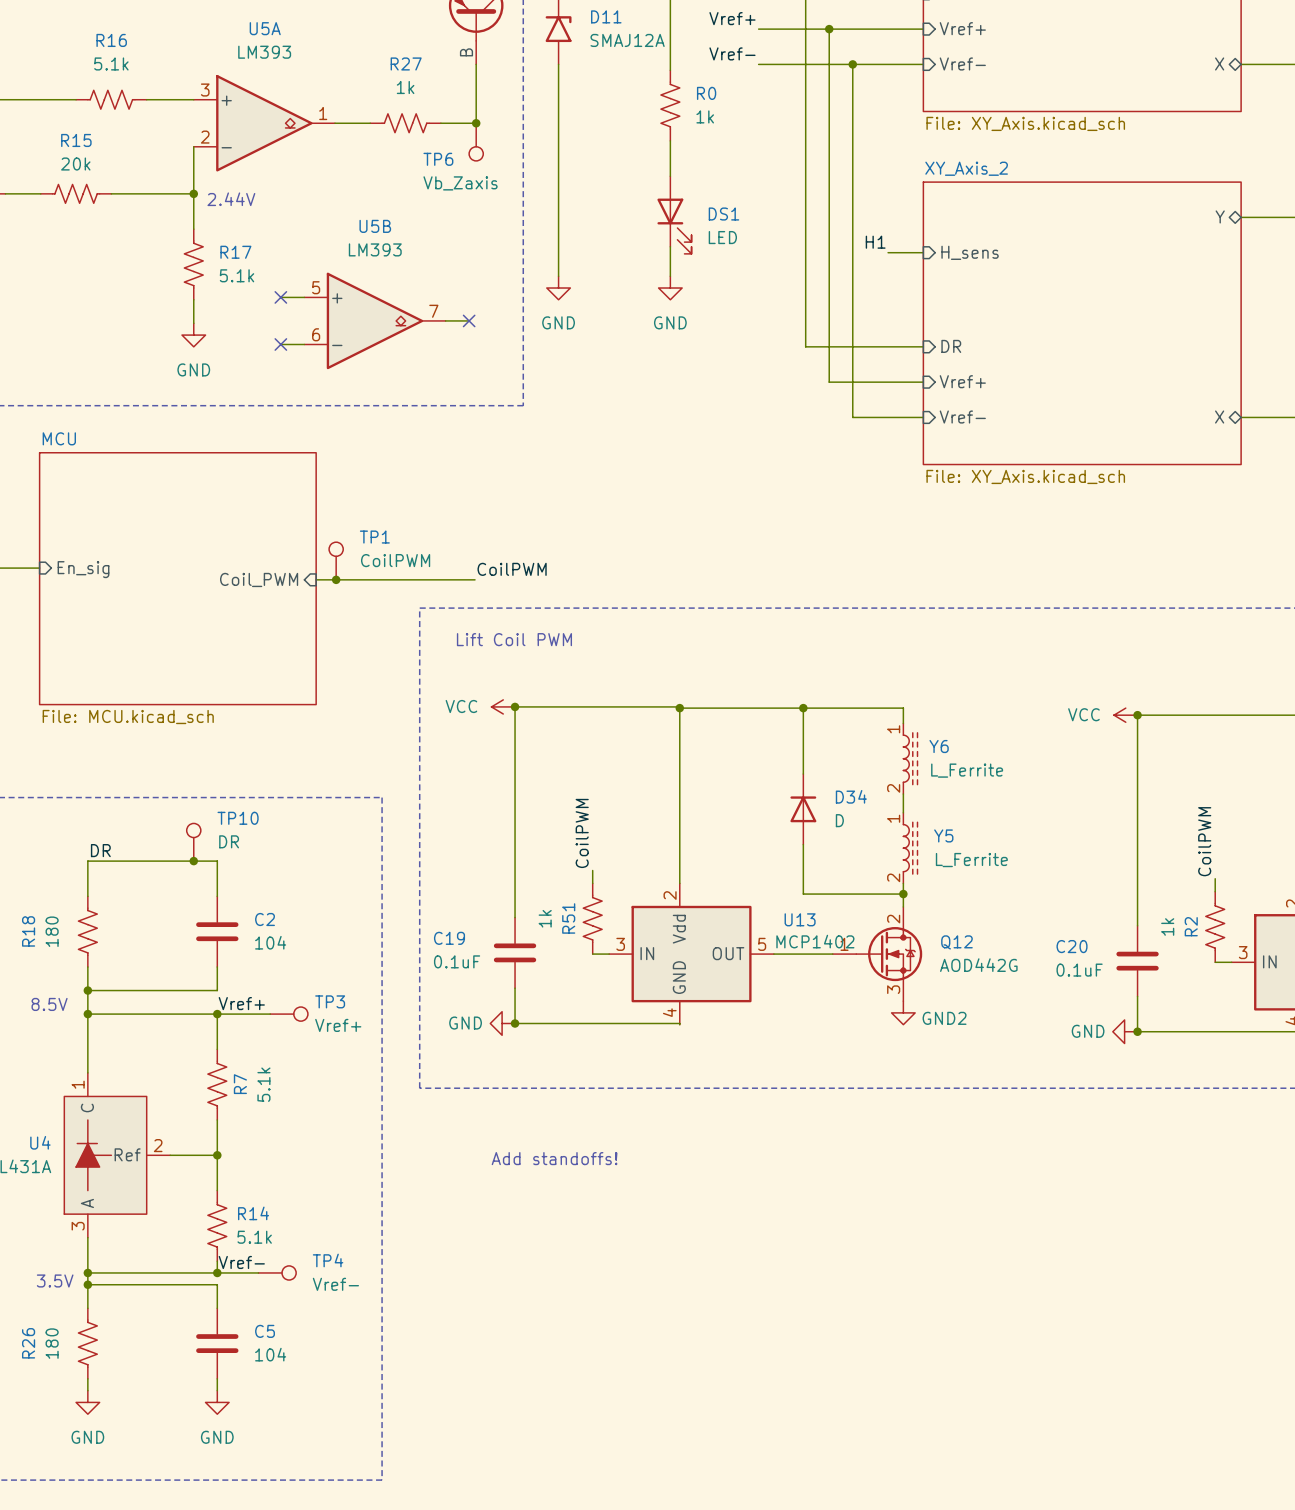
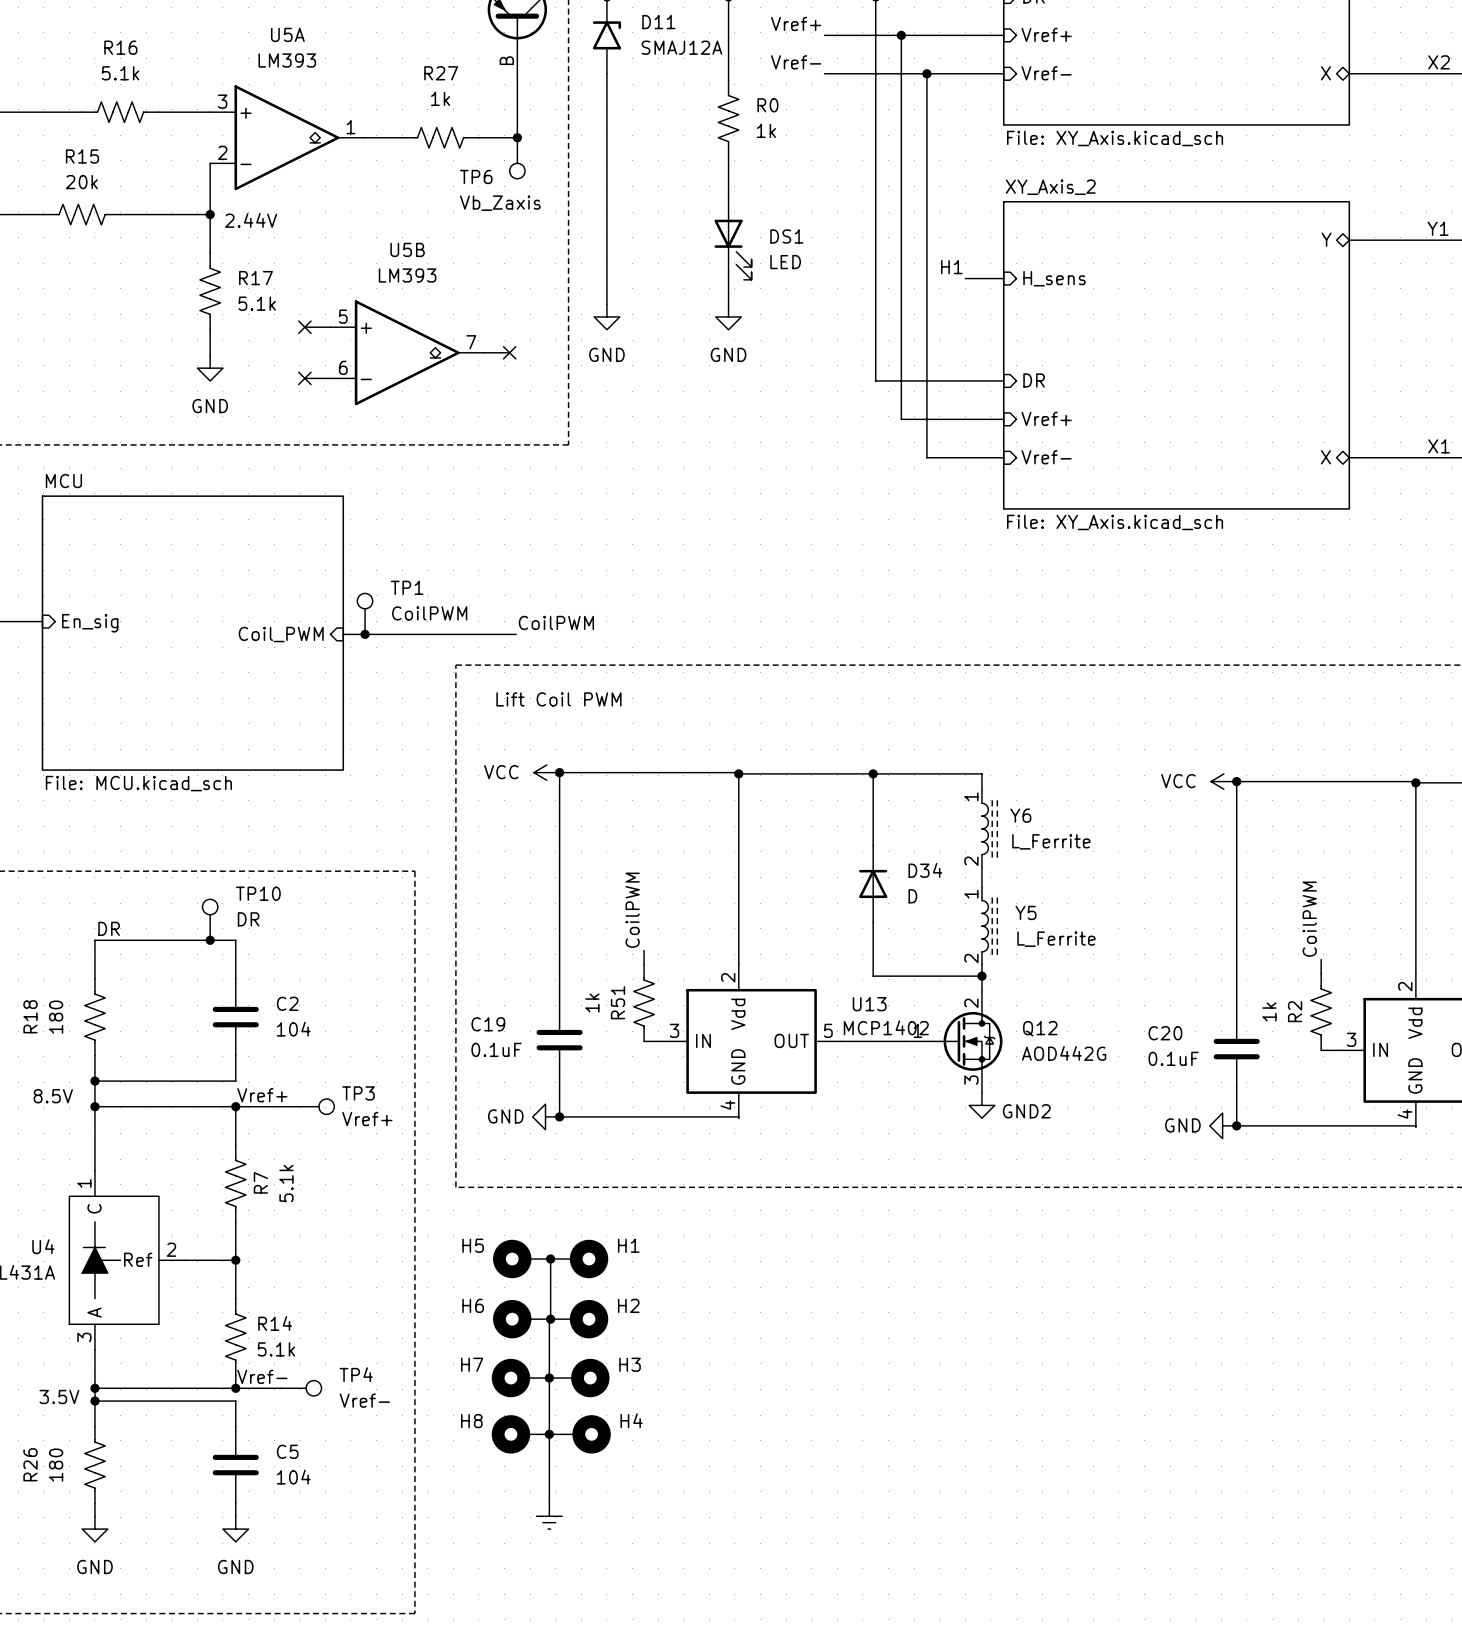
H5: none -> (521, 1259)
wire: none -> (550, 1259) (549, 1503)
junction: none -> (550, 1259)
H1: none -> (579, 1259)
text: Add standoffs! (554, 1158) -> none
H6: none -> (521, 1319)
junction: none -> (550, 1319)
H2: none -> (579, 1319)
H7: none -> (520, 1378)
junction: none -> (549, 1378)
H3: none -> (580, 1378)
H8: none -> (520, 1434)
junction: none -> (549, 1434)
H4: none -> (581, 1434)
power symbol: none -> (549, 1516)

